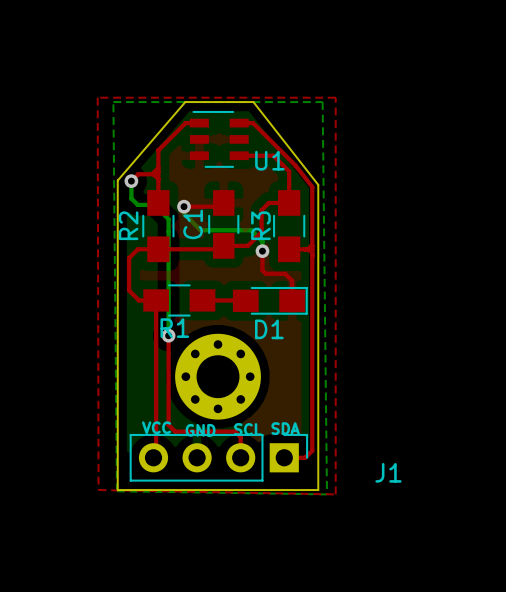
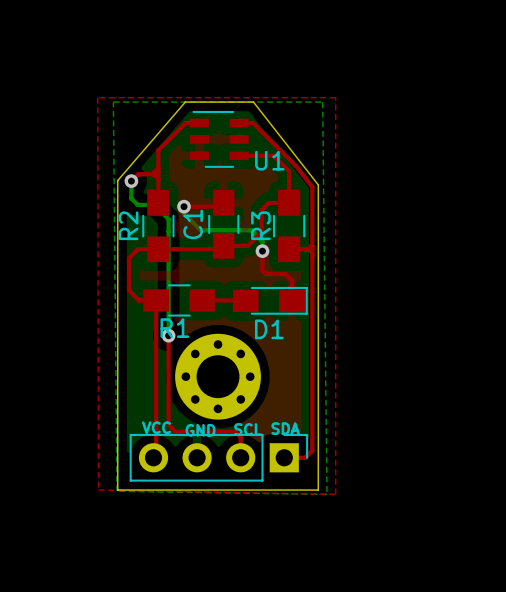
J1 name: J1 (388, 472) -> none

